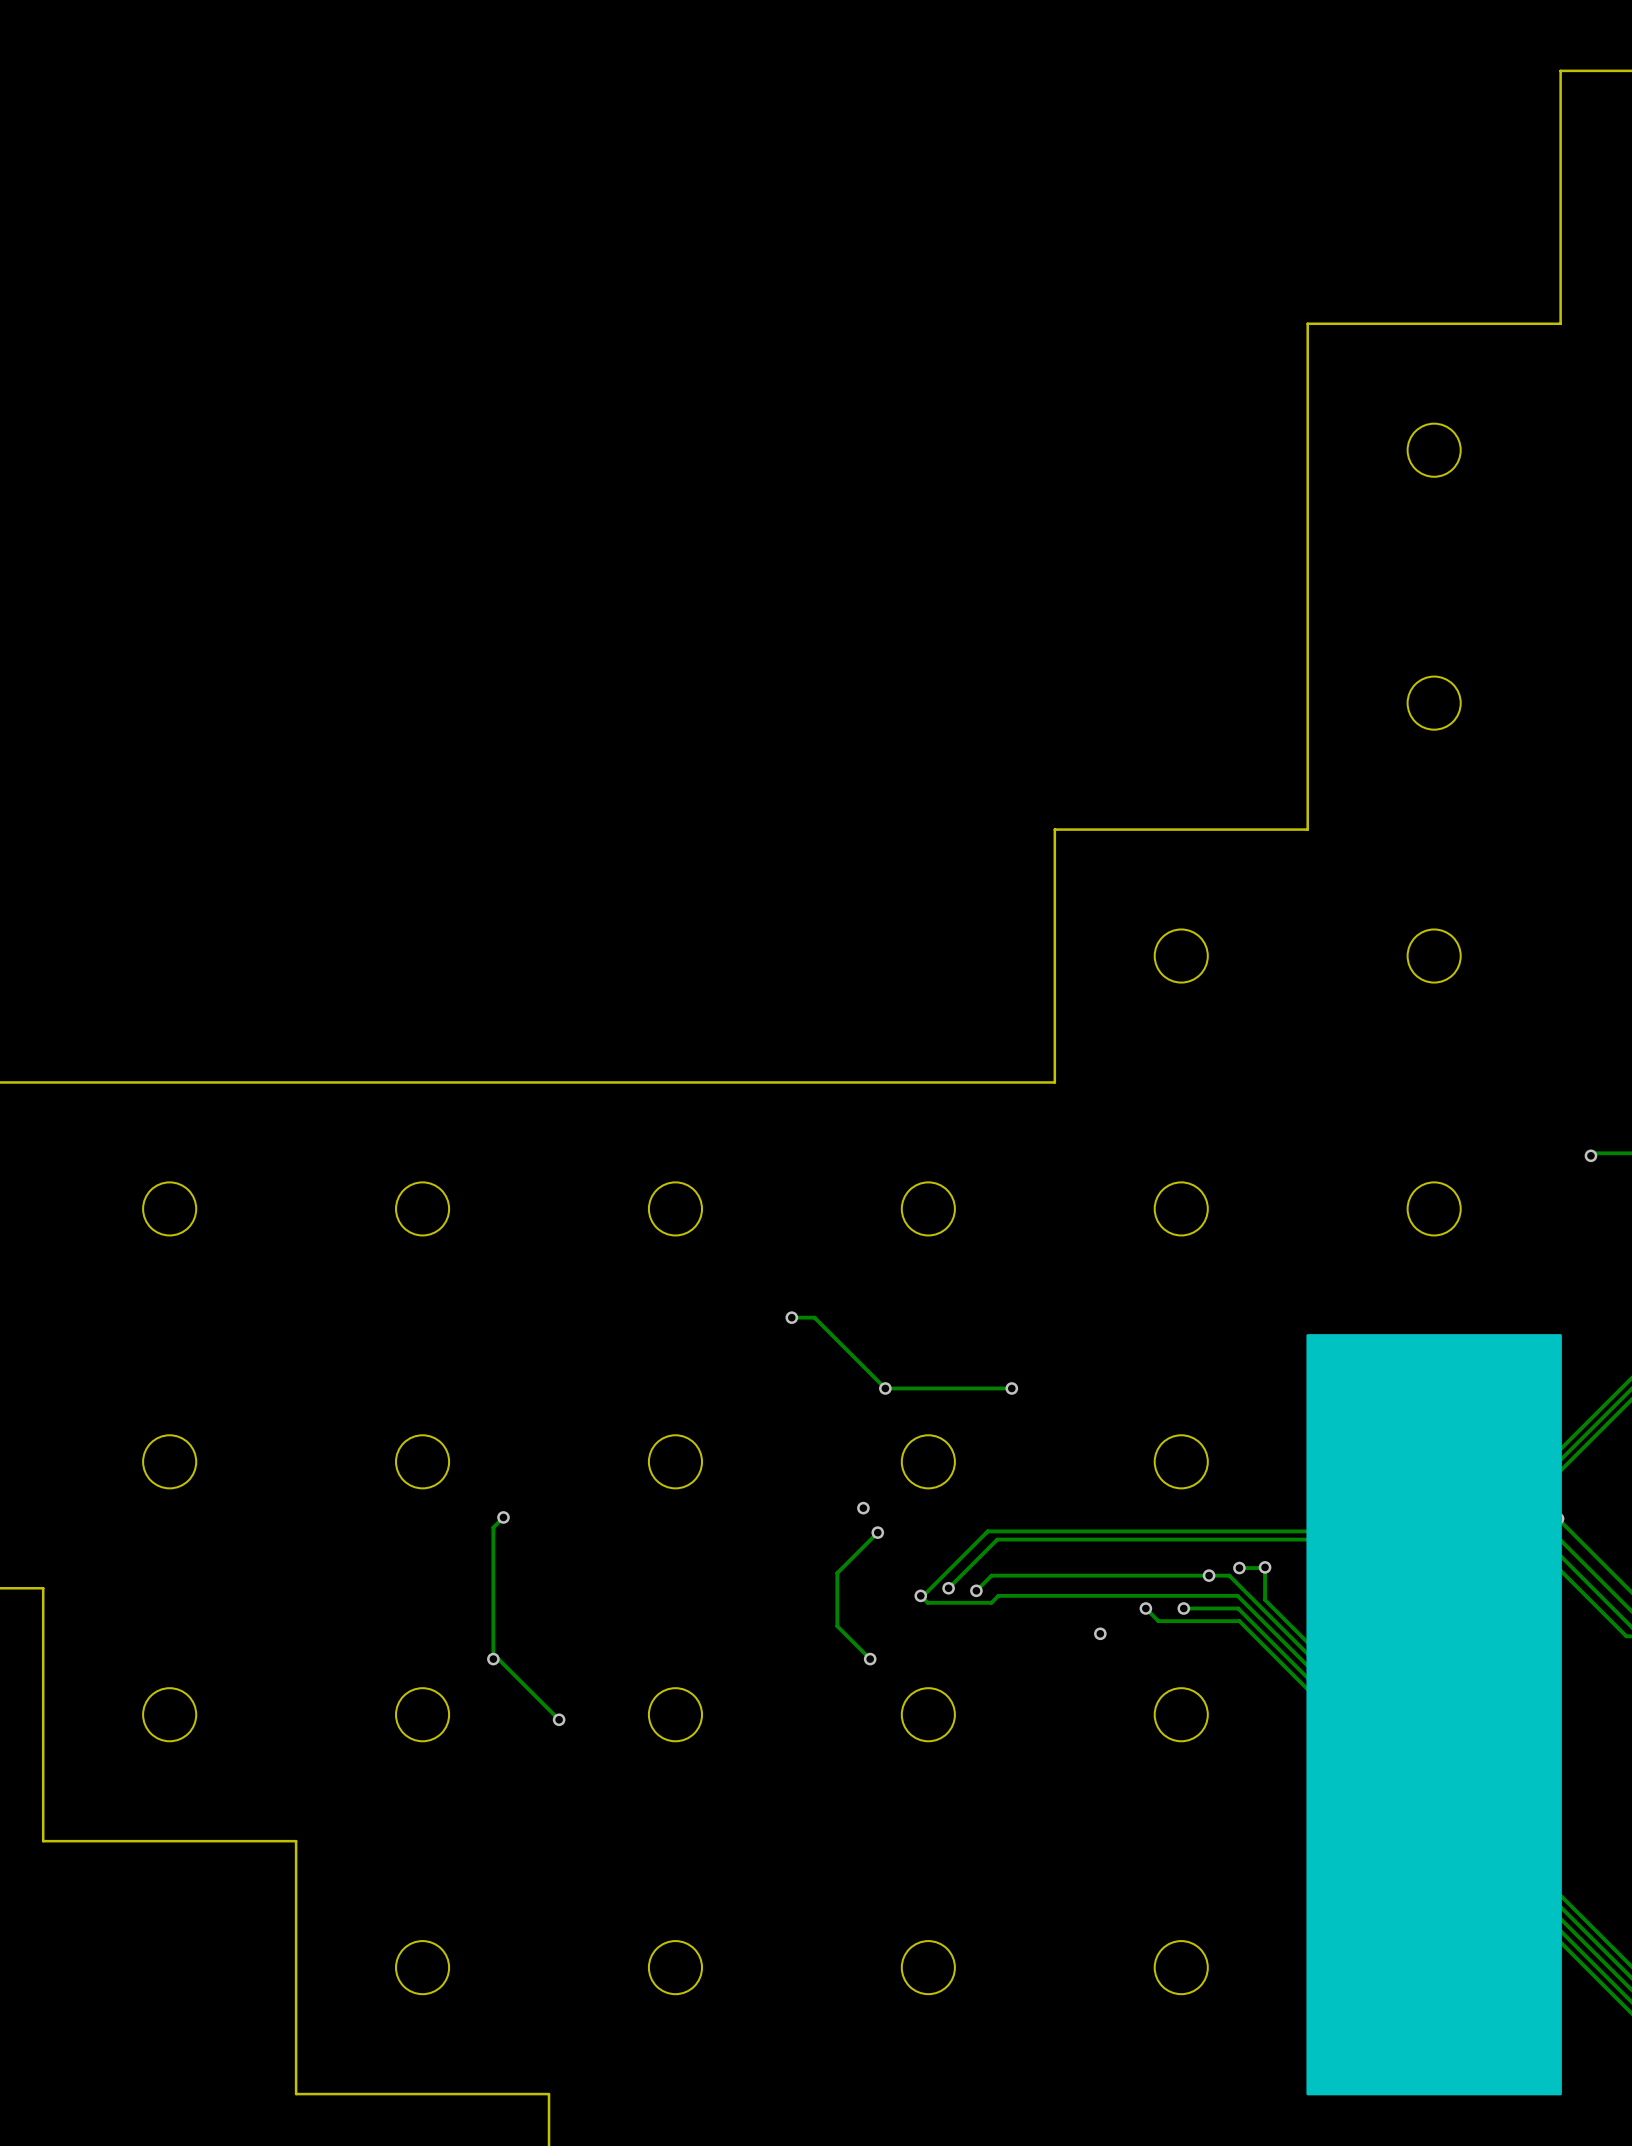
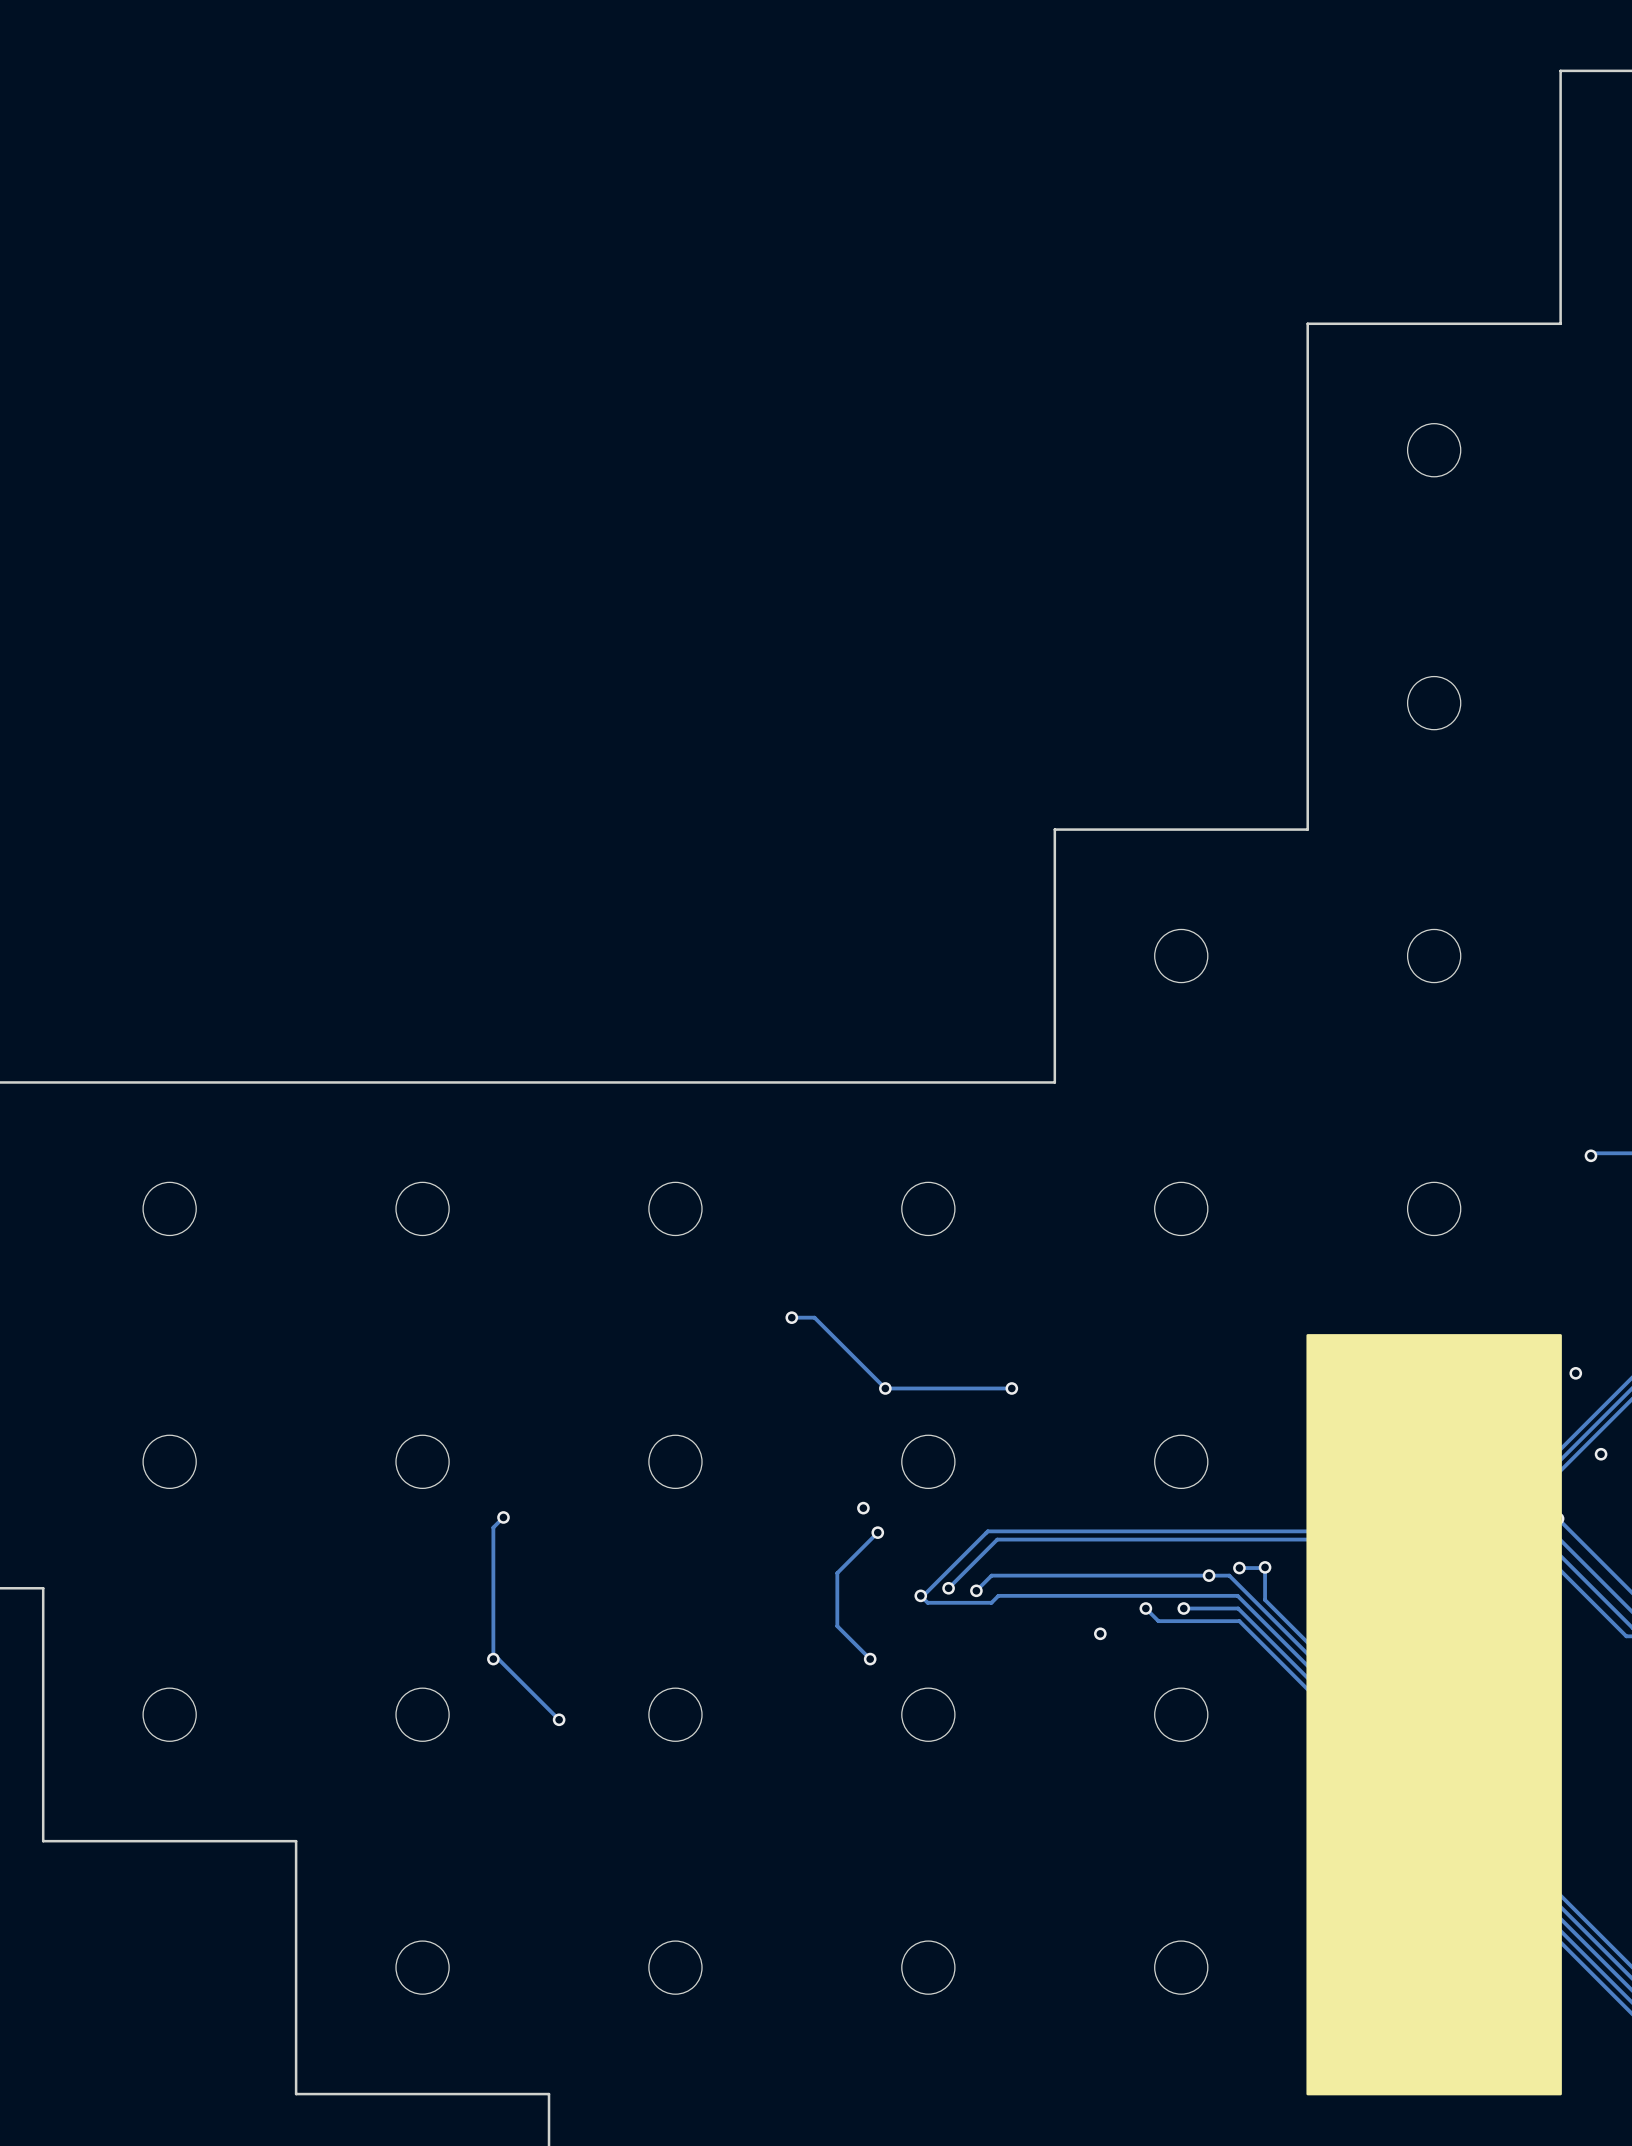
via: none -> (1575, 1373)
via: none -> (1601, 1454)

